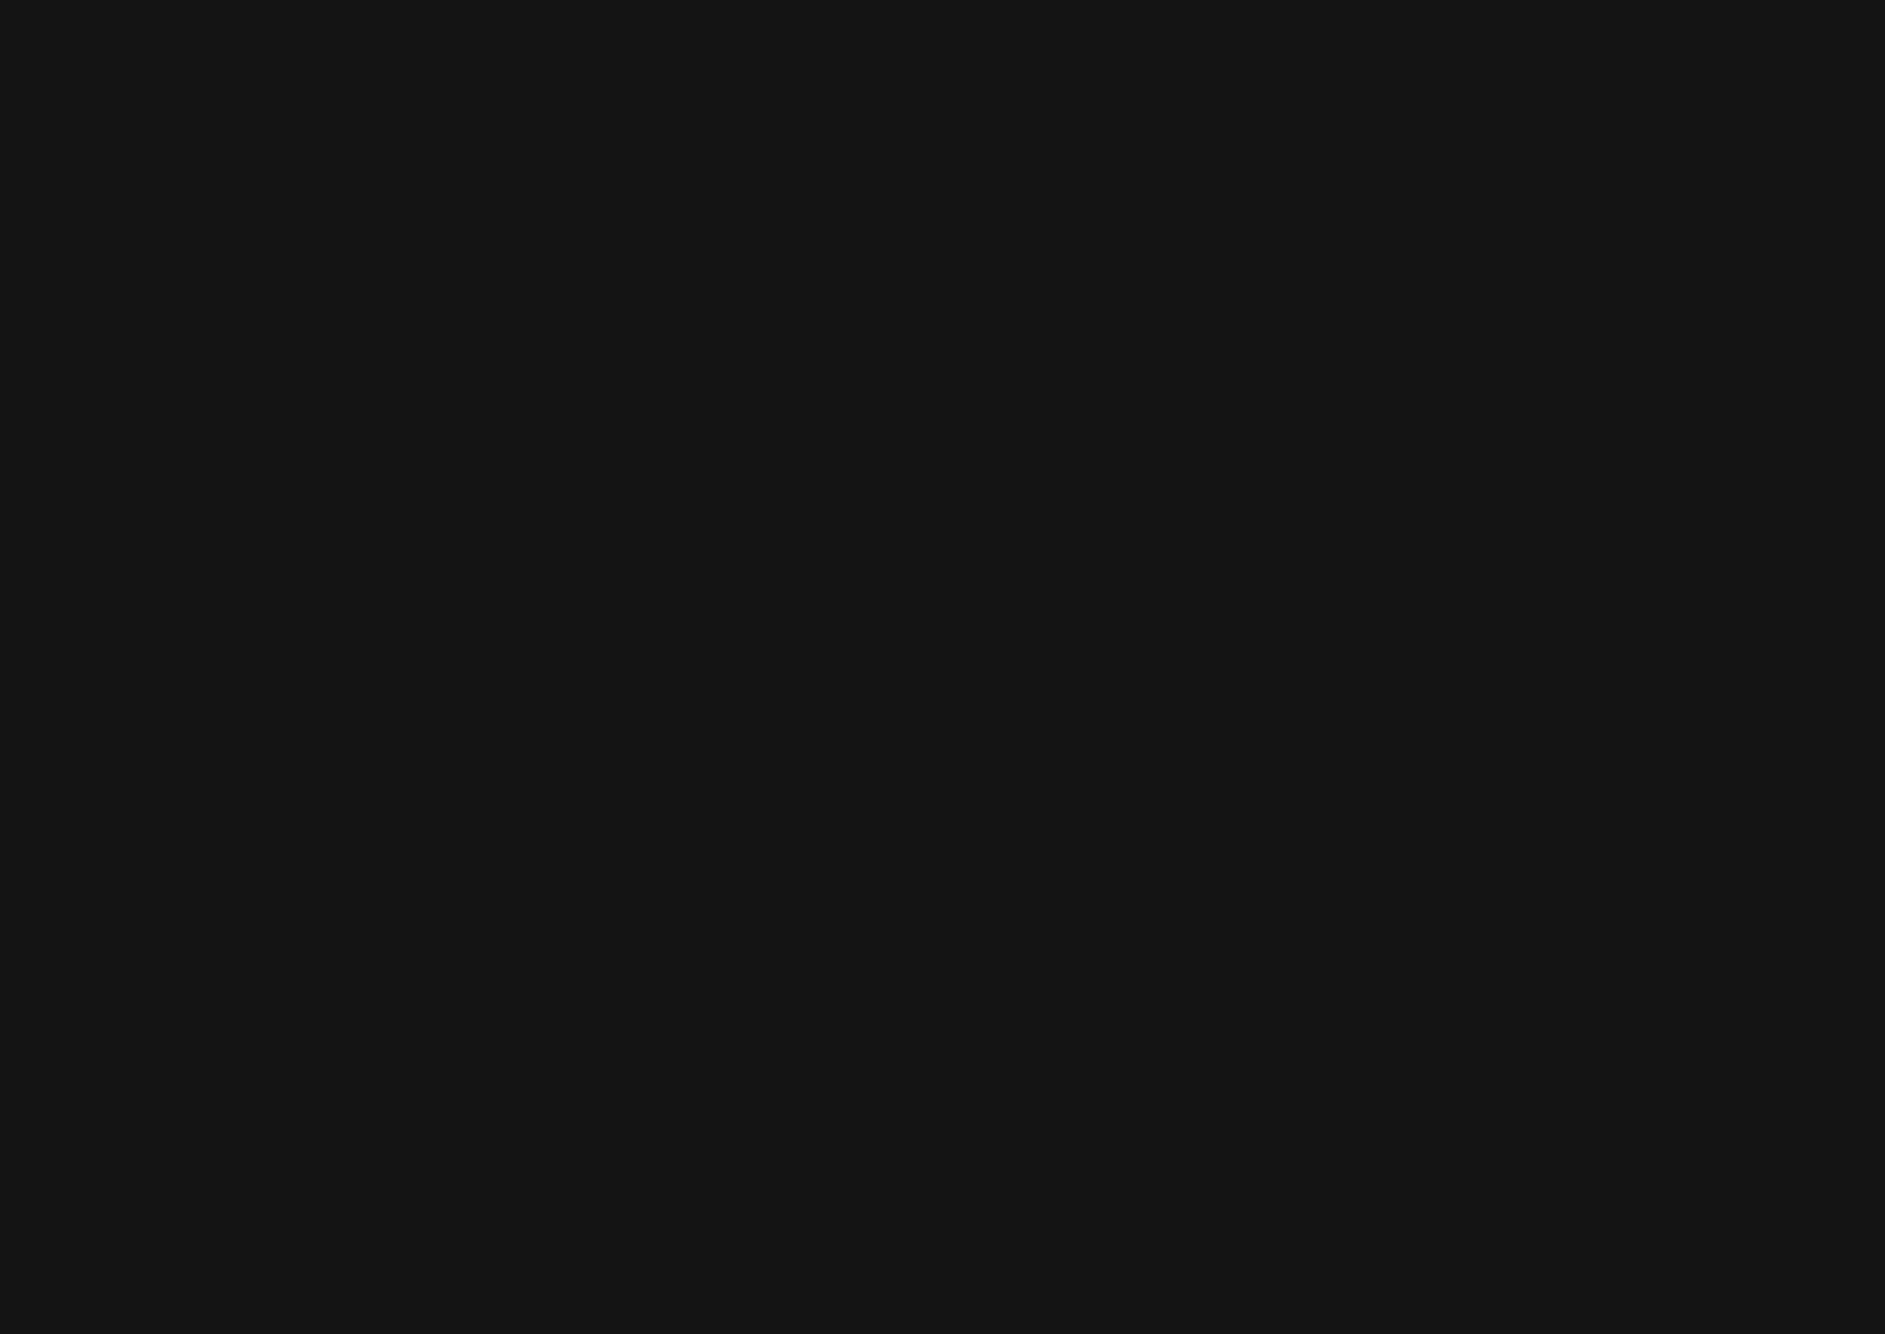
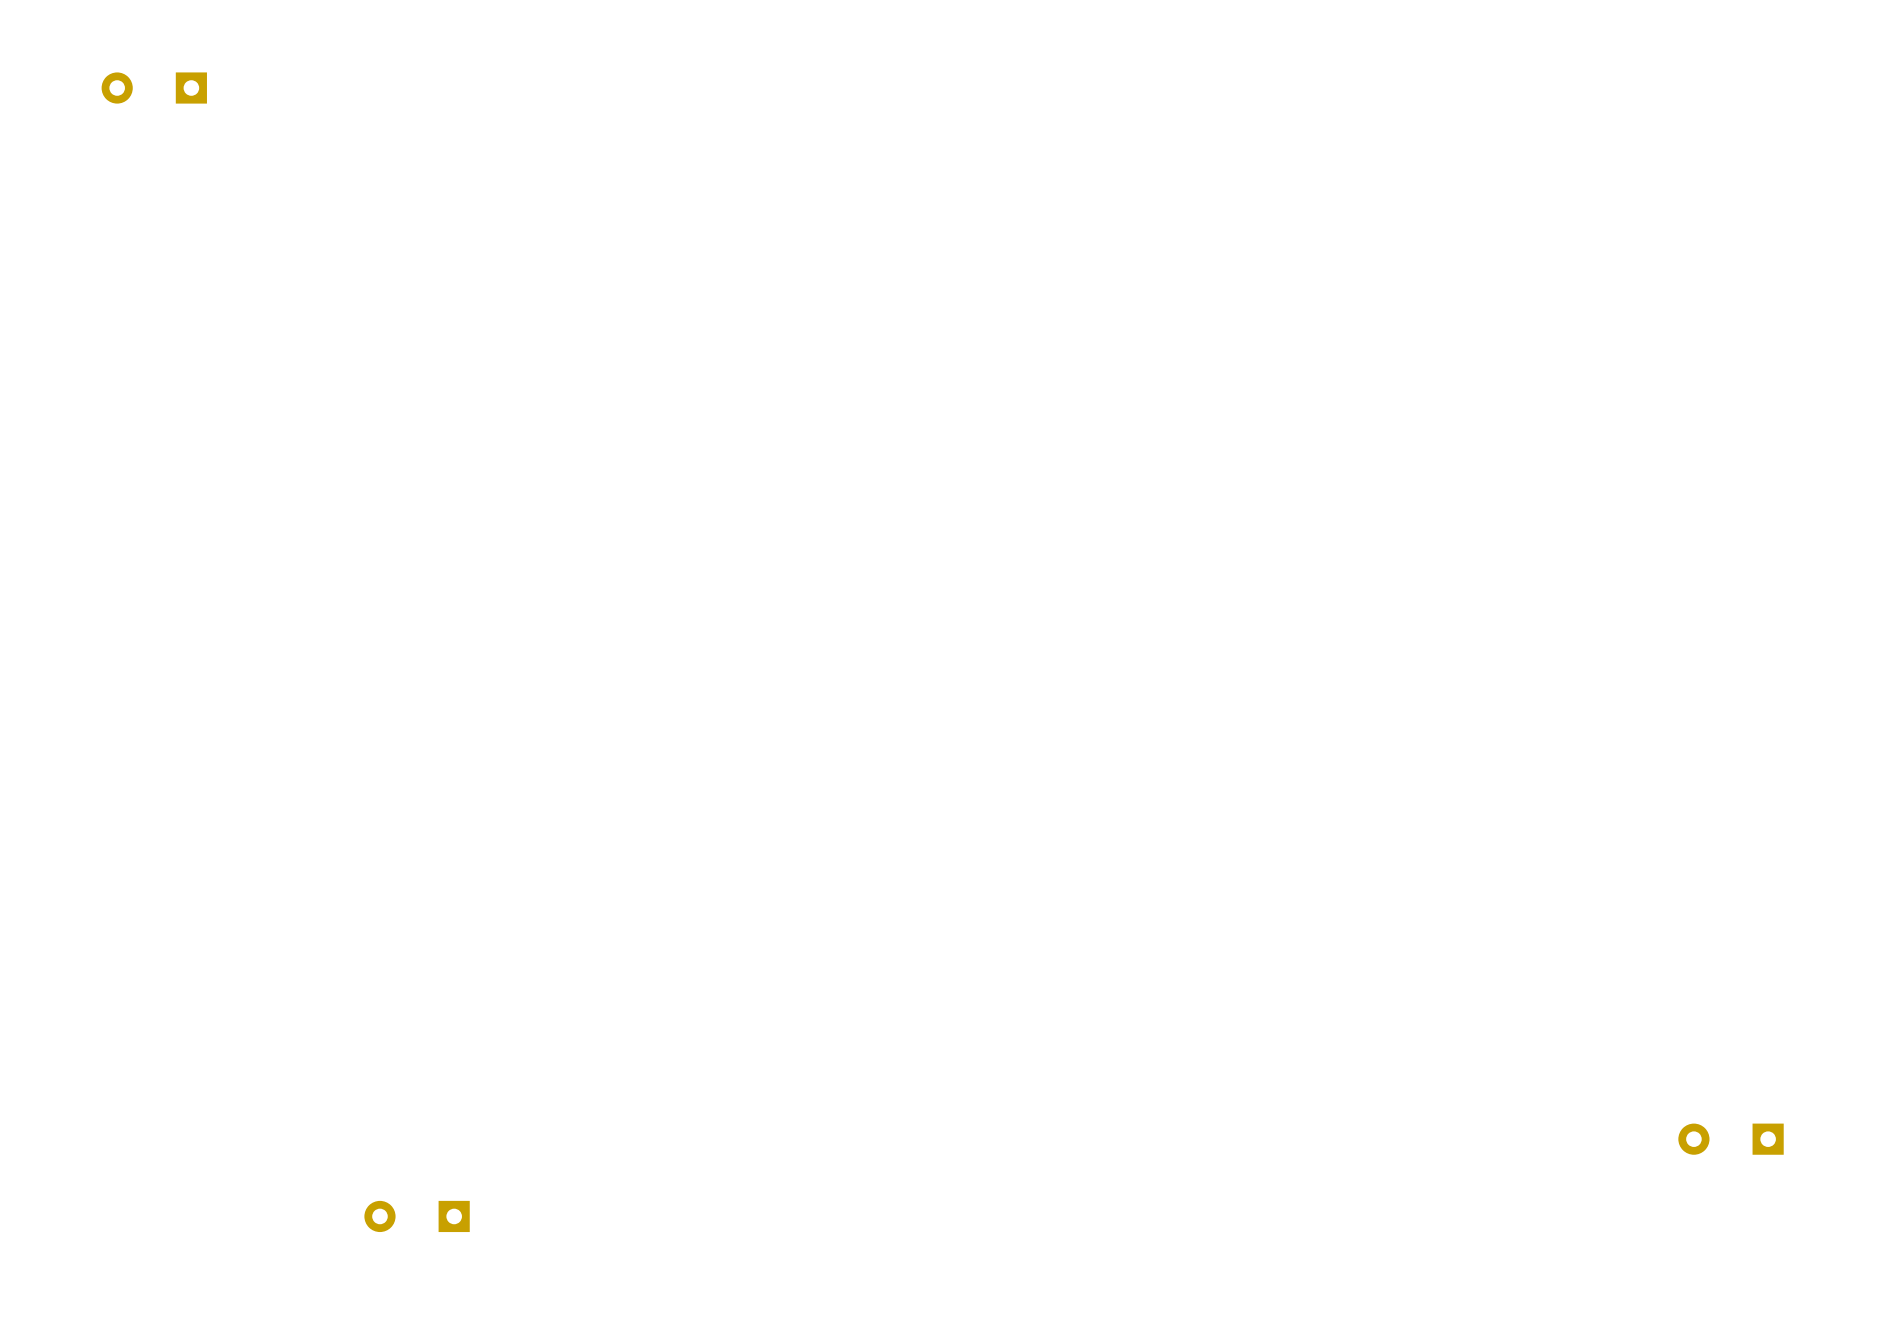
part: none -> (154, 88)
part: none -> (1731, 1139)
part: none -> (417, 1216)

